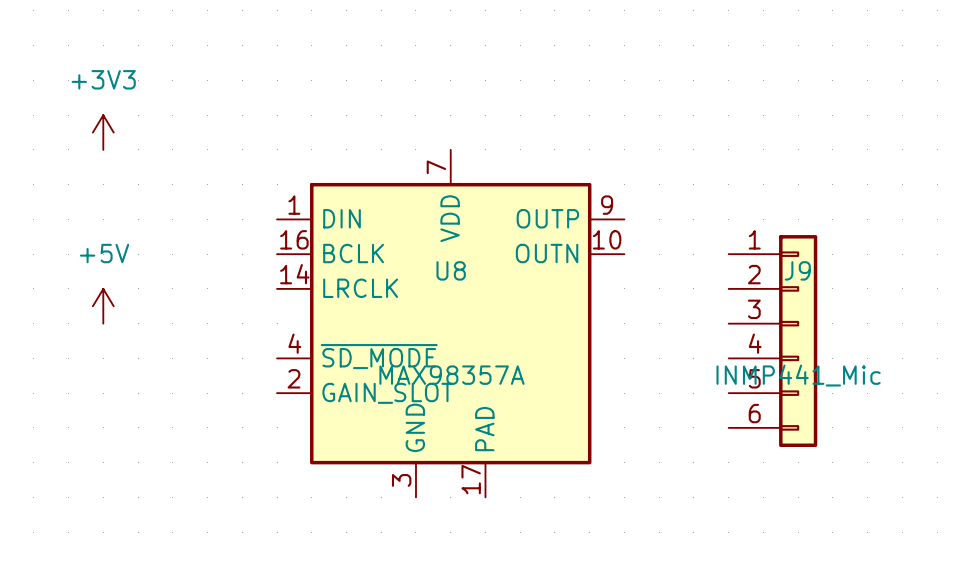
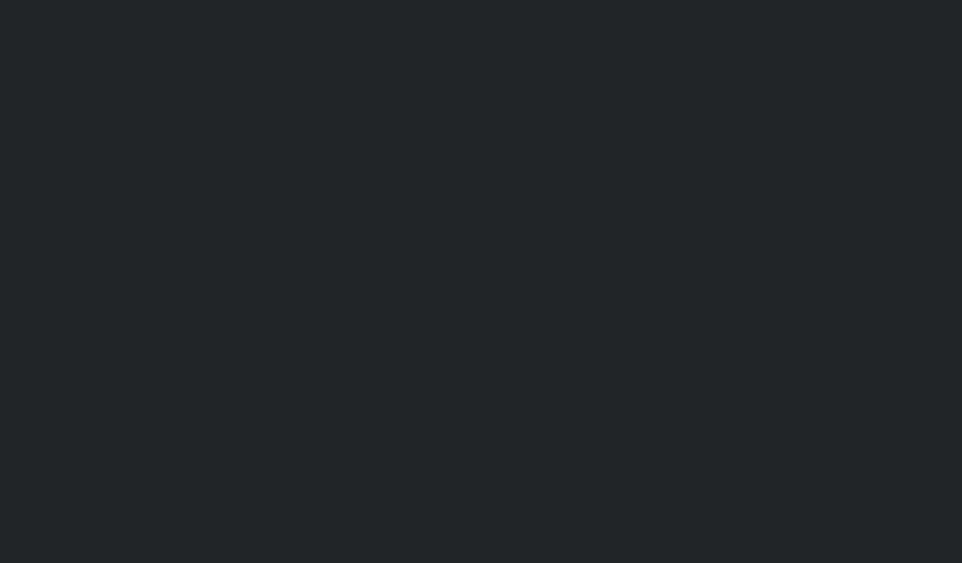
power symbol: +3V3 (103, 132) -> none
power symbol: +5V (103, 306) -> none
U8: MAX98357A (450, 323) -> none
J9: INMP441_Mic (772, 341) -> none

